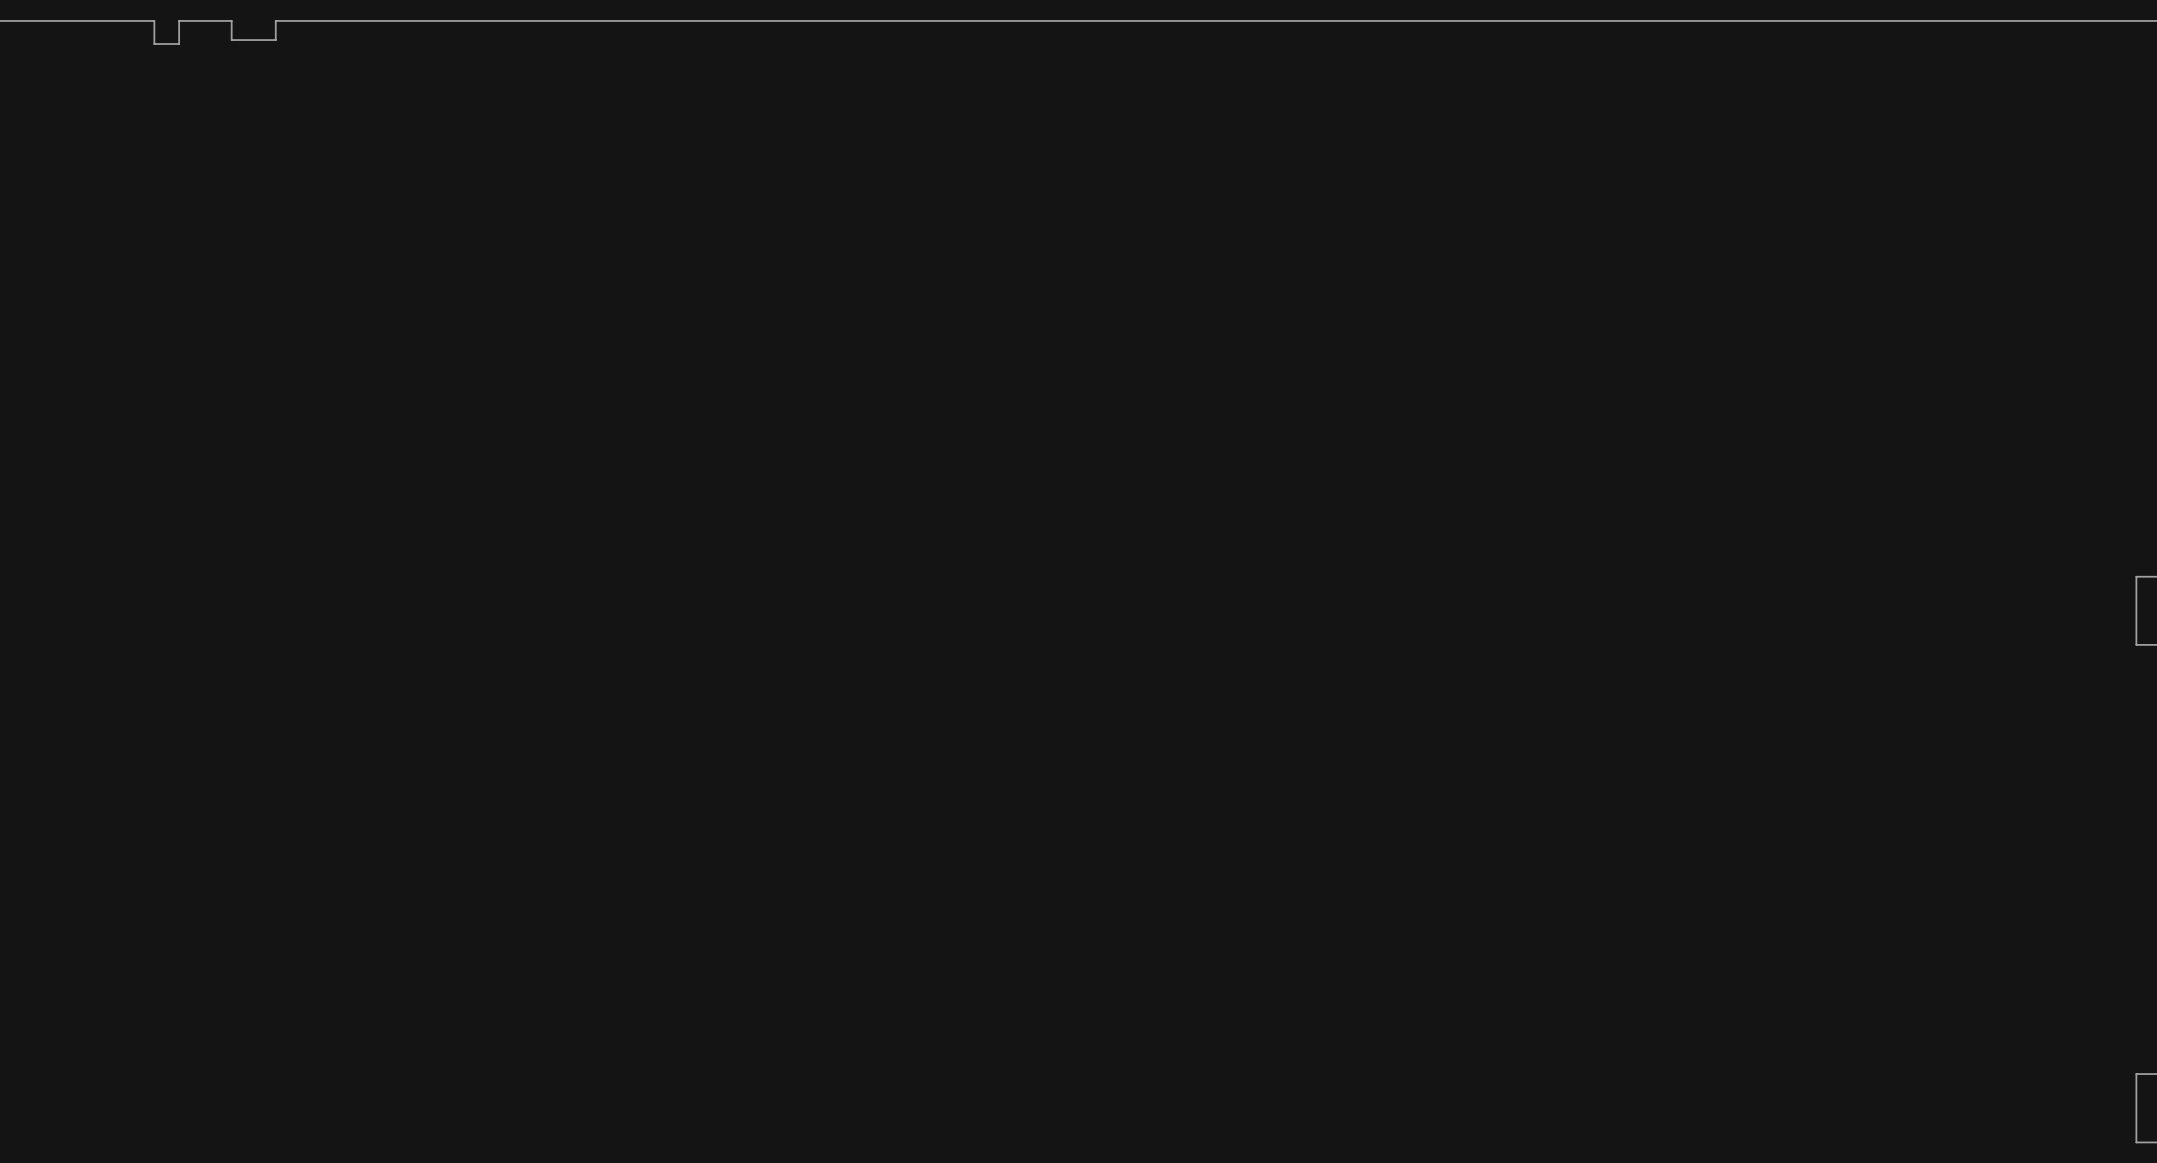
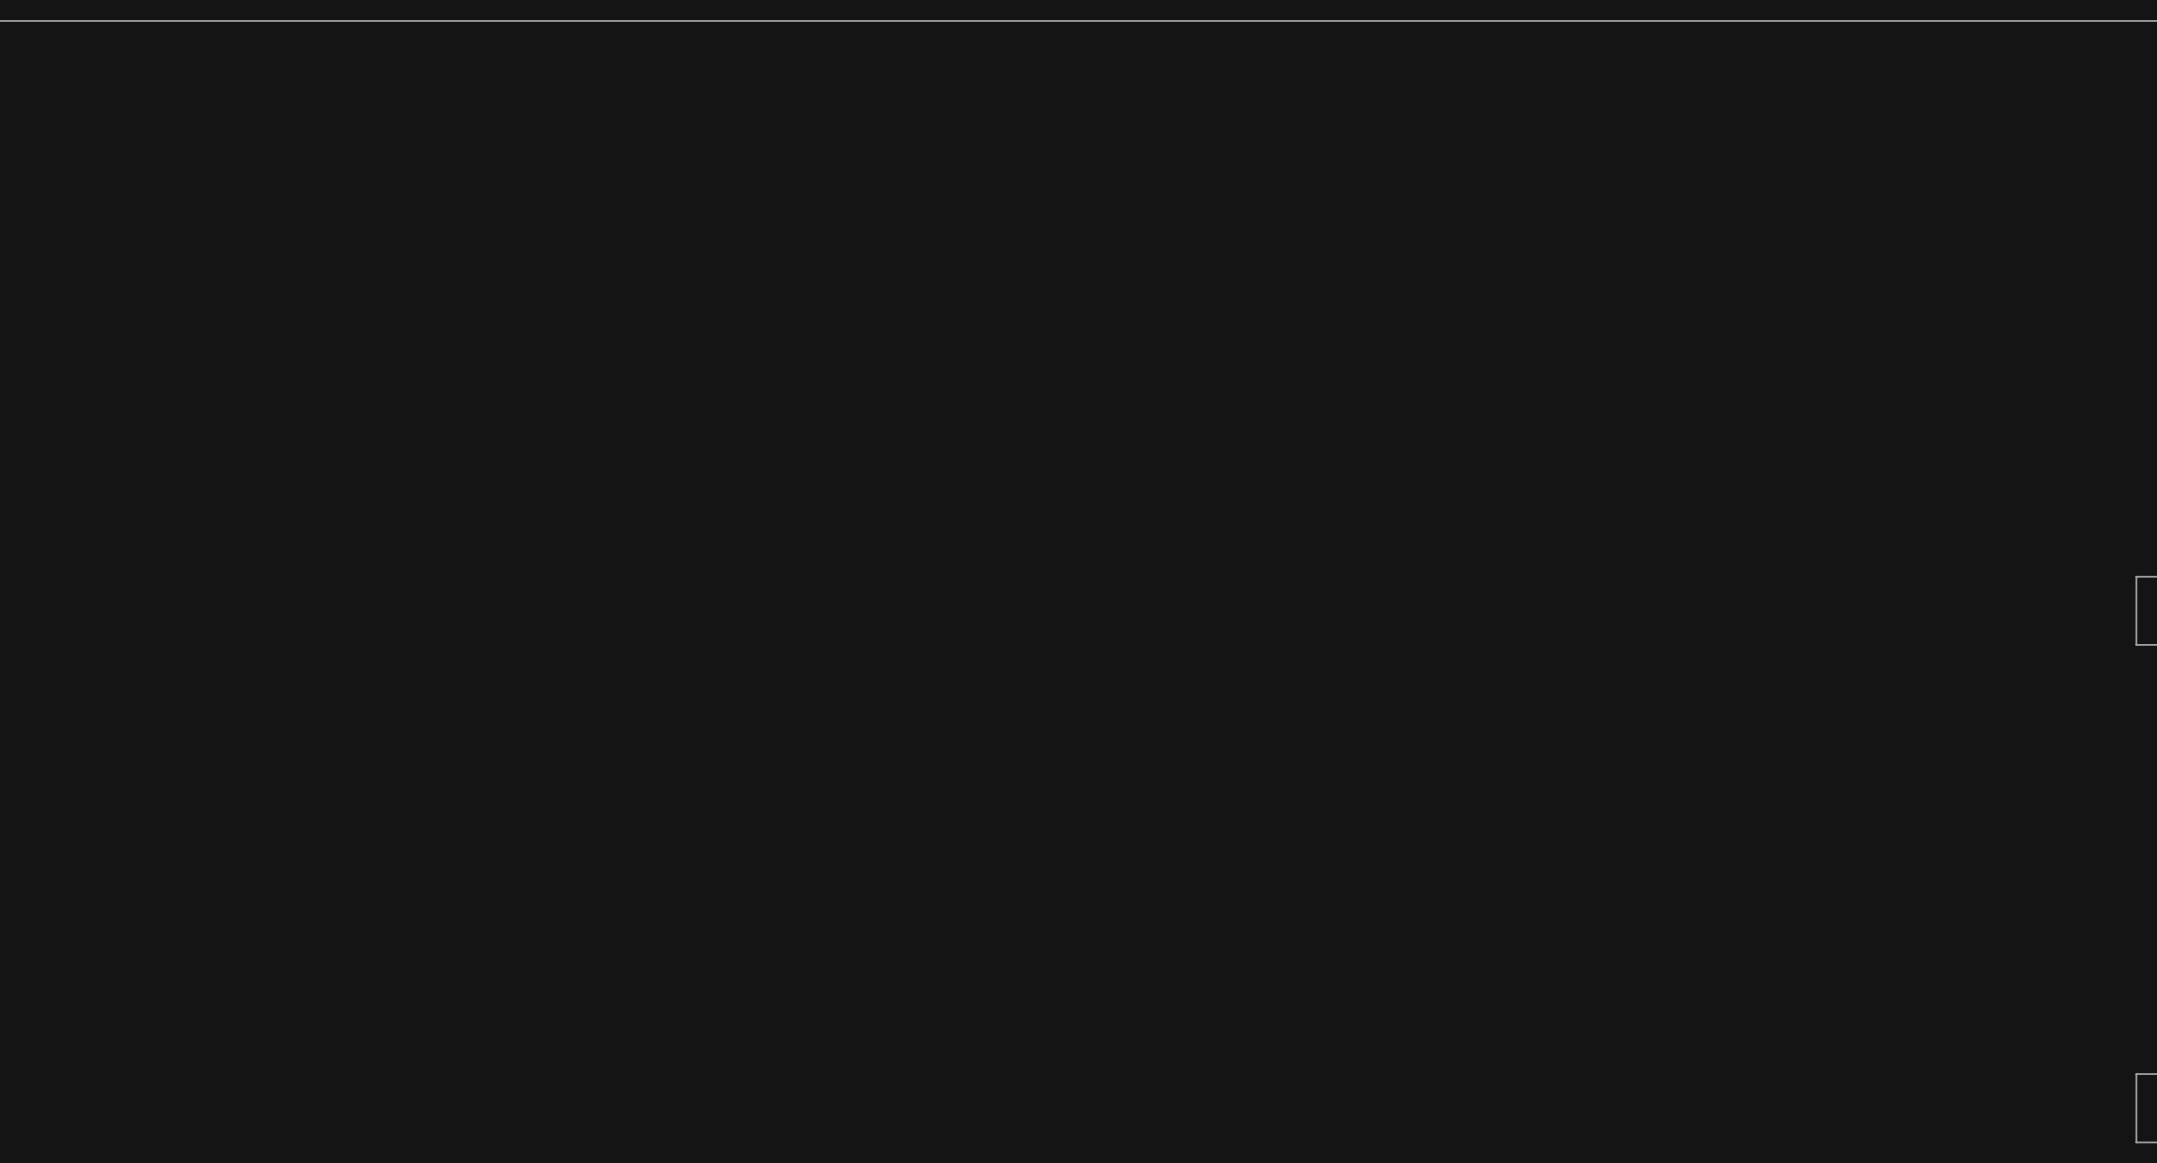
board edge: (179, 20) (179, 44) (154, 44) (154, 20) -> (179, 20) (154, 20)
board edge: (275, 20) (275, 40) (231, 40) (231, 20) -> (275, 20) (231, 20)

